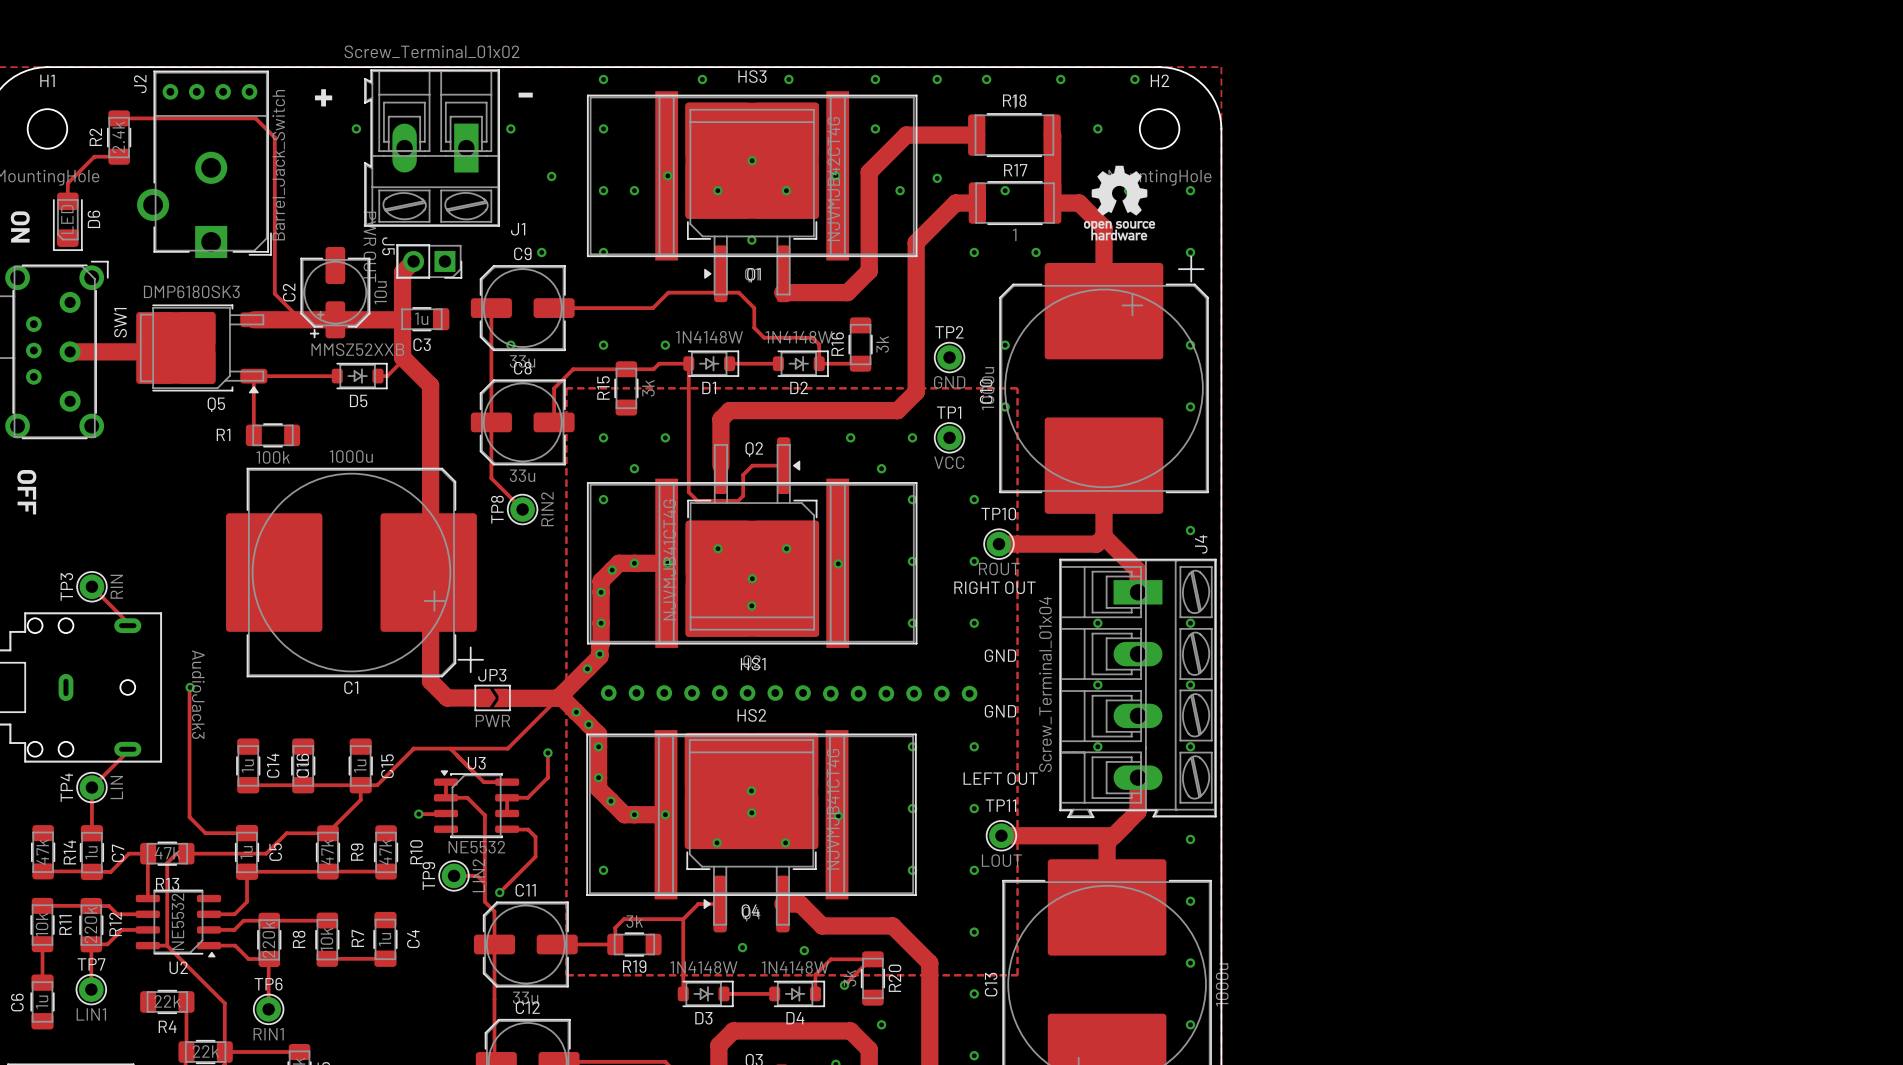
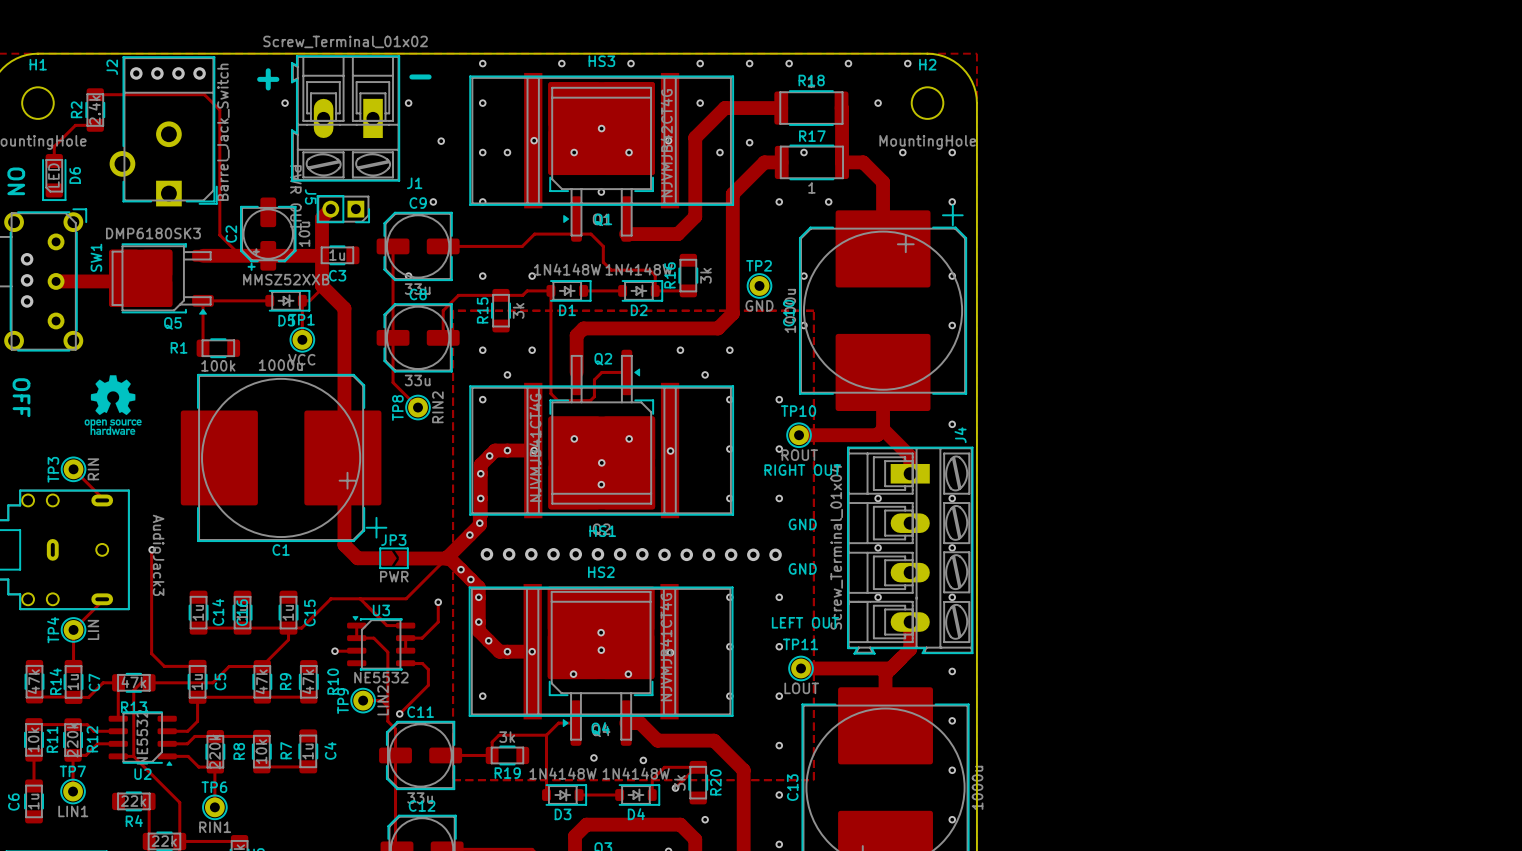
drawing: [1083, 165, 1156, 241] -> none
track: none -> (302, 300) (302, 339)
TP1 position: (949, 437) -> (302, 339)
drawing: none -> [84, 375, 142, 435]

